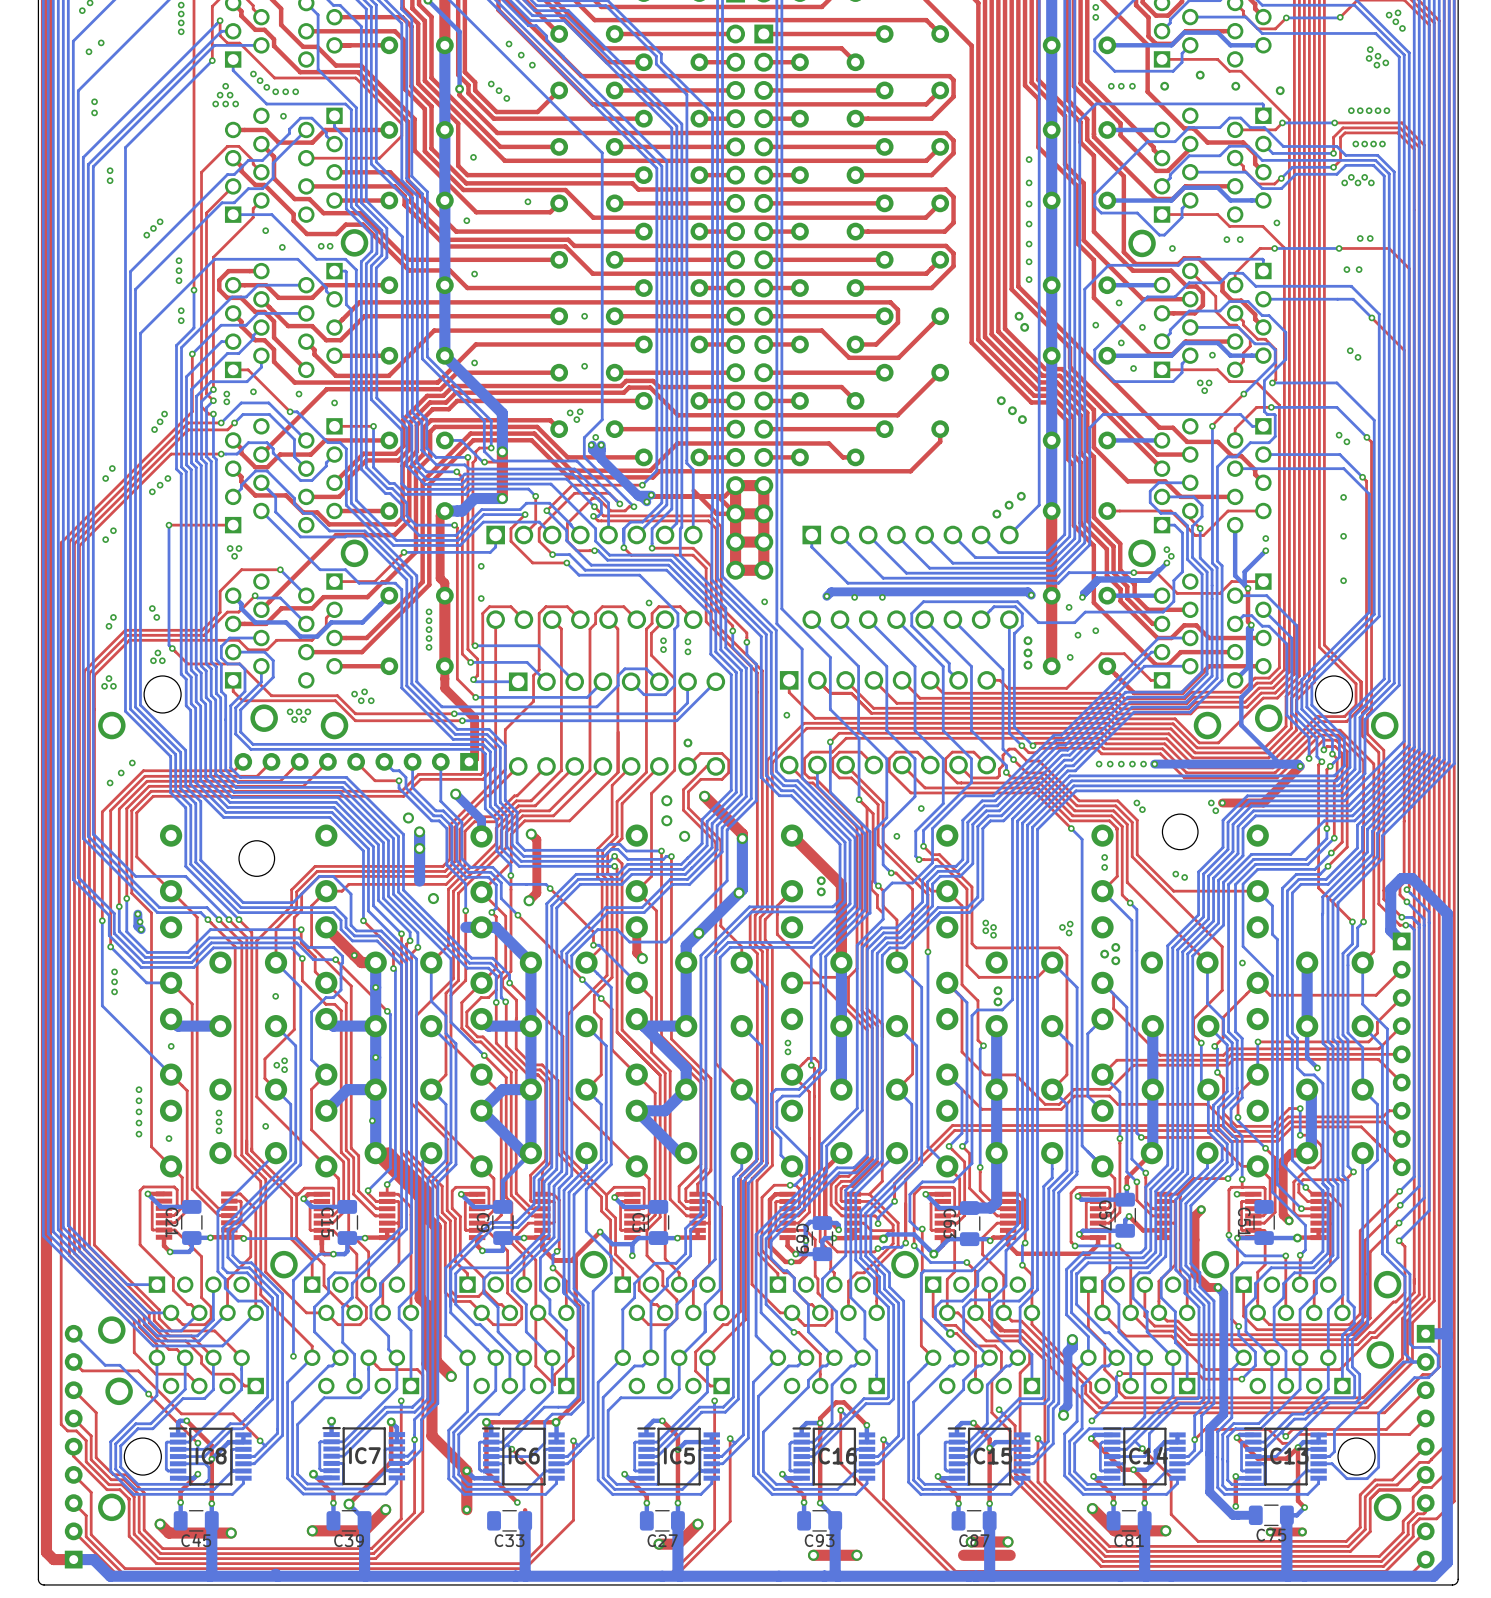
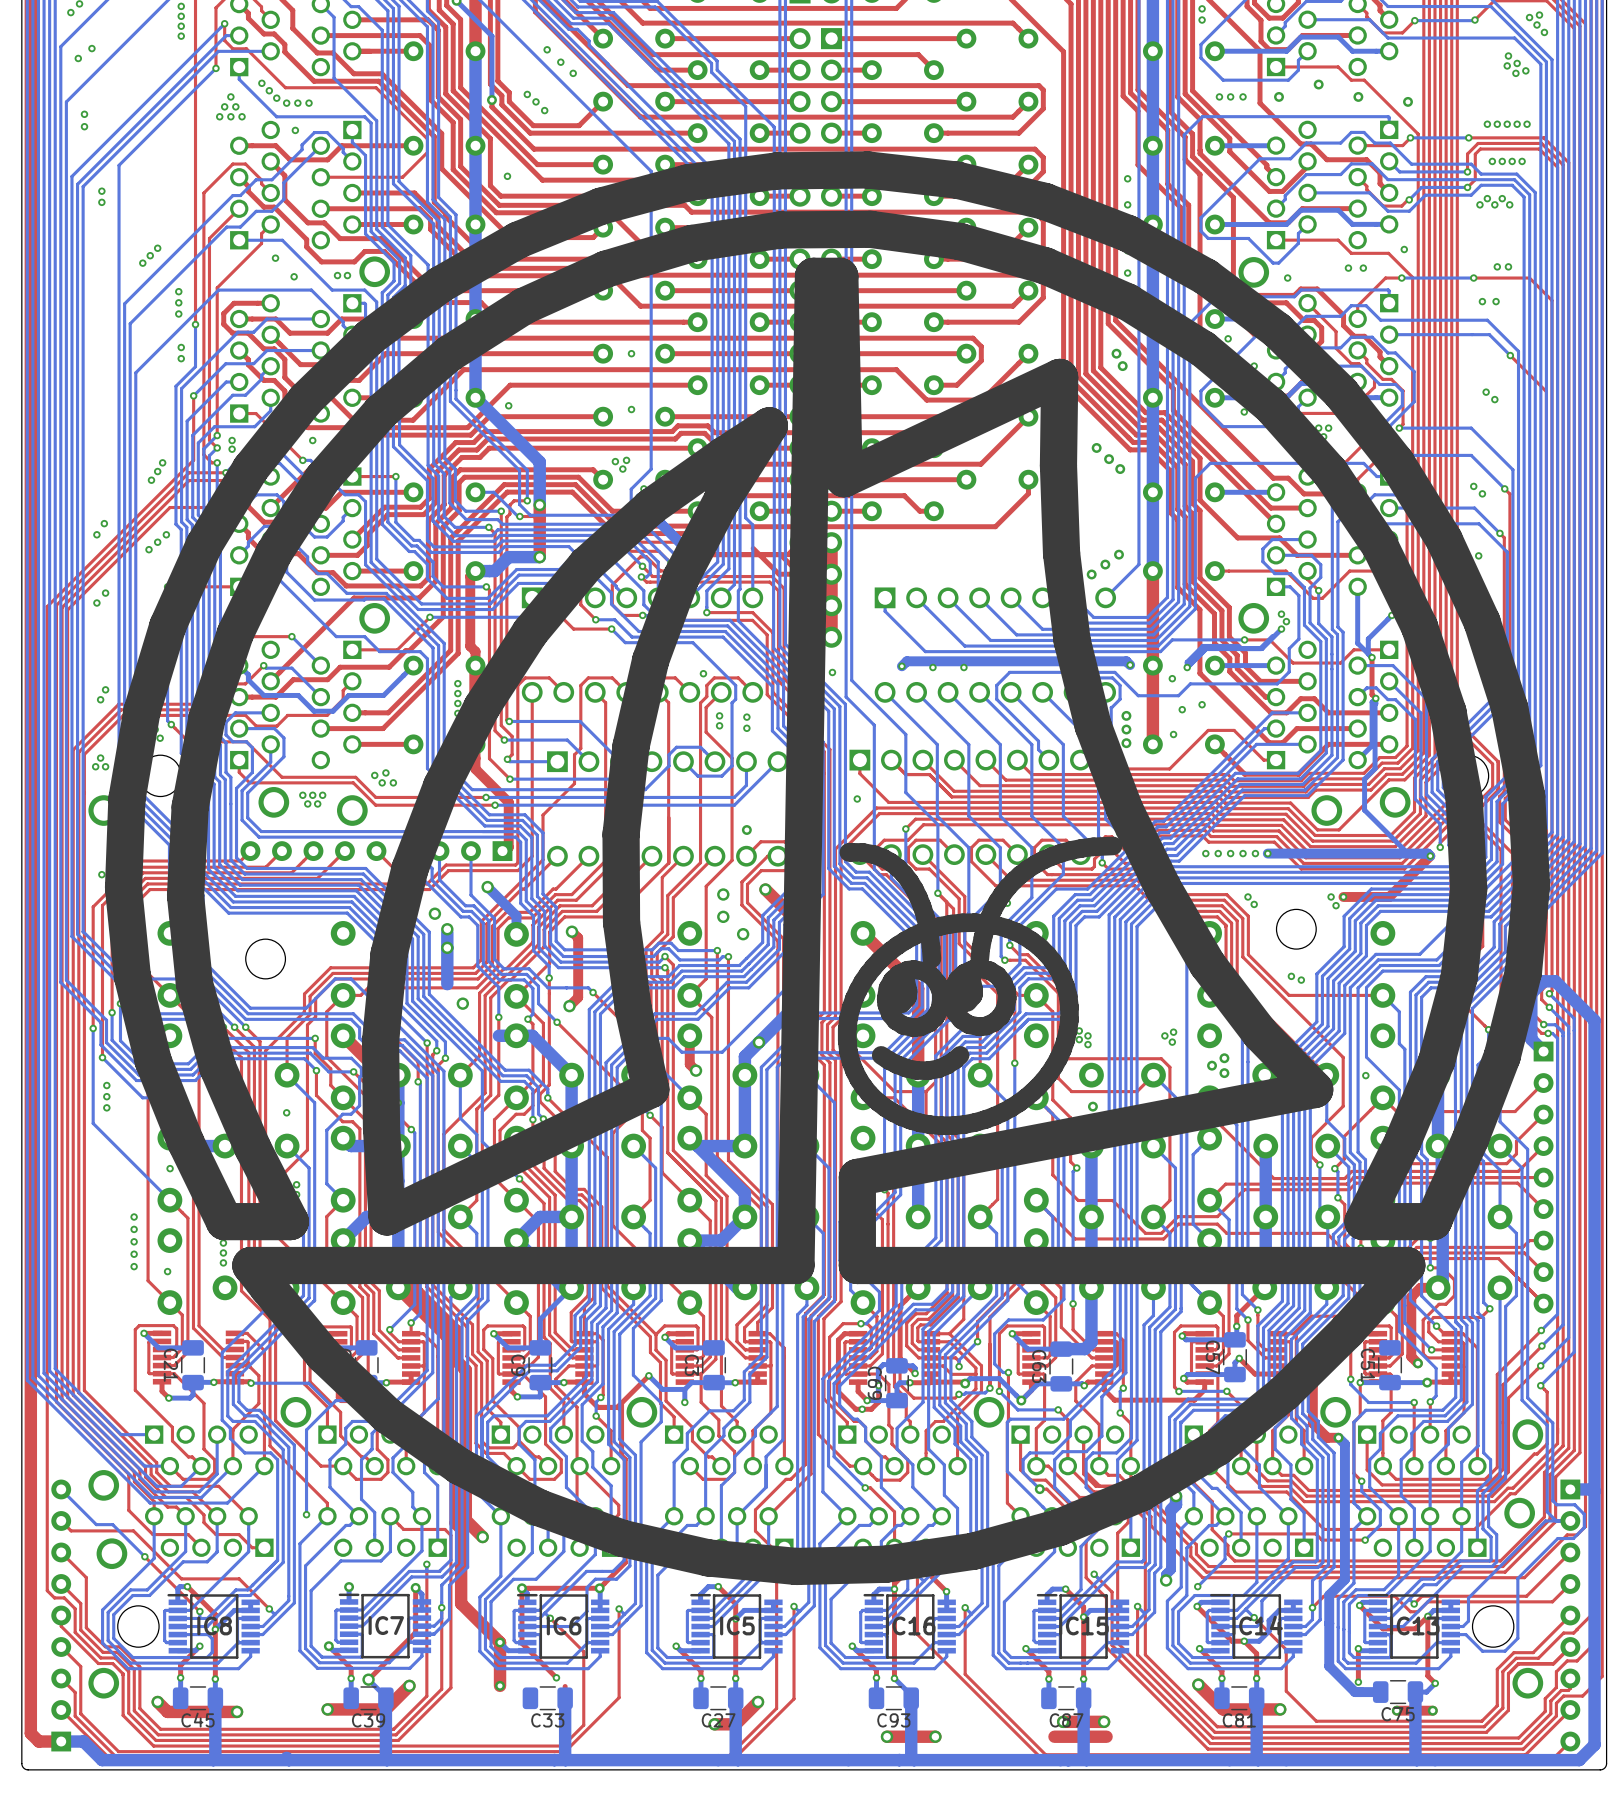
drawing: none -> [104, 151, 1551, 1586]

